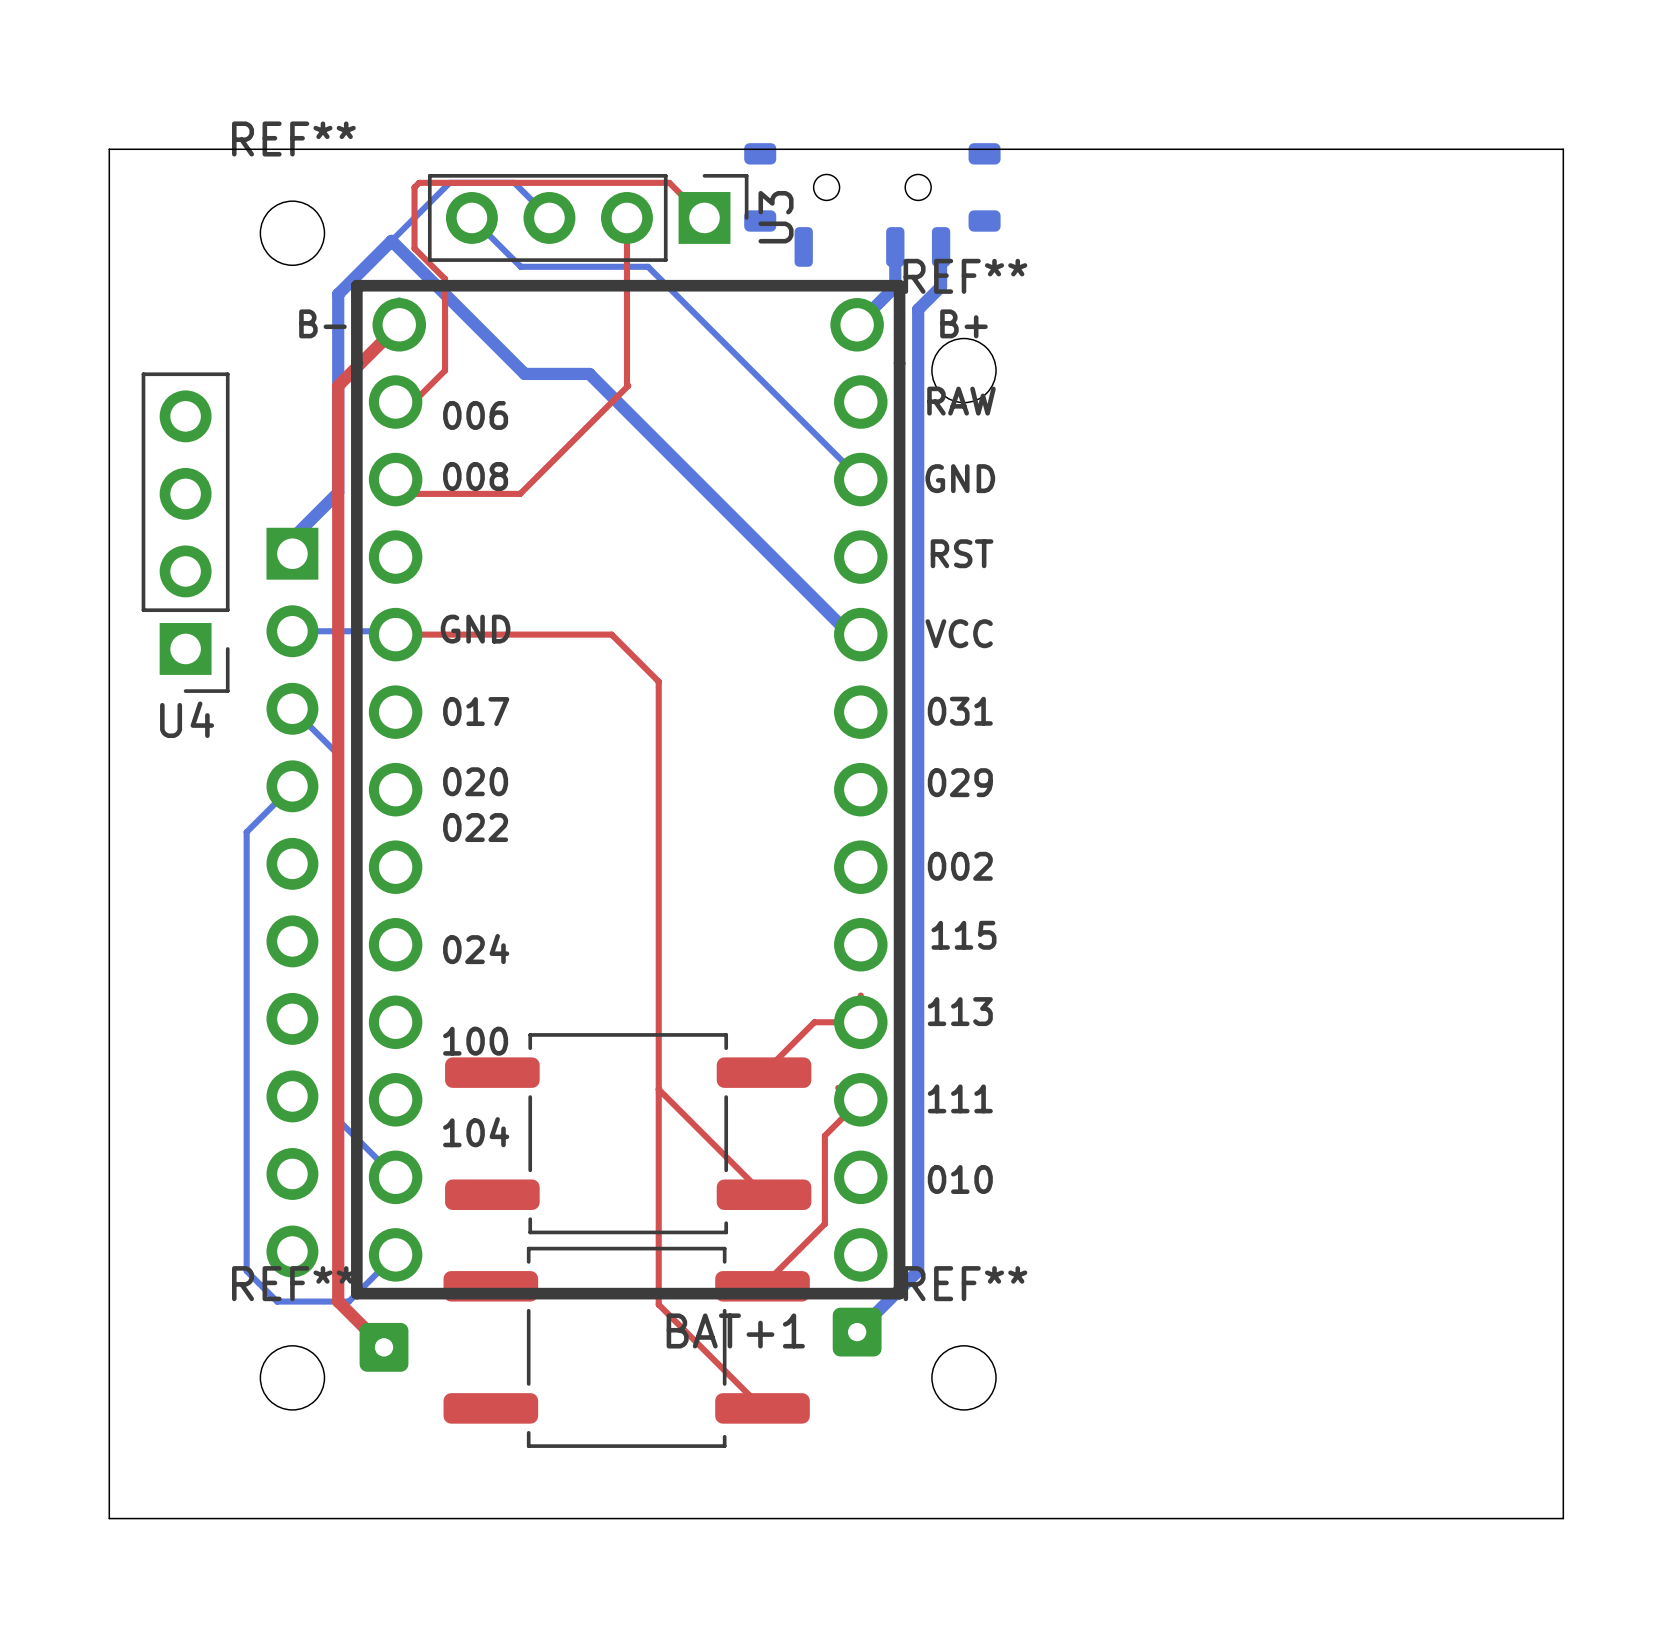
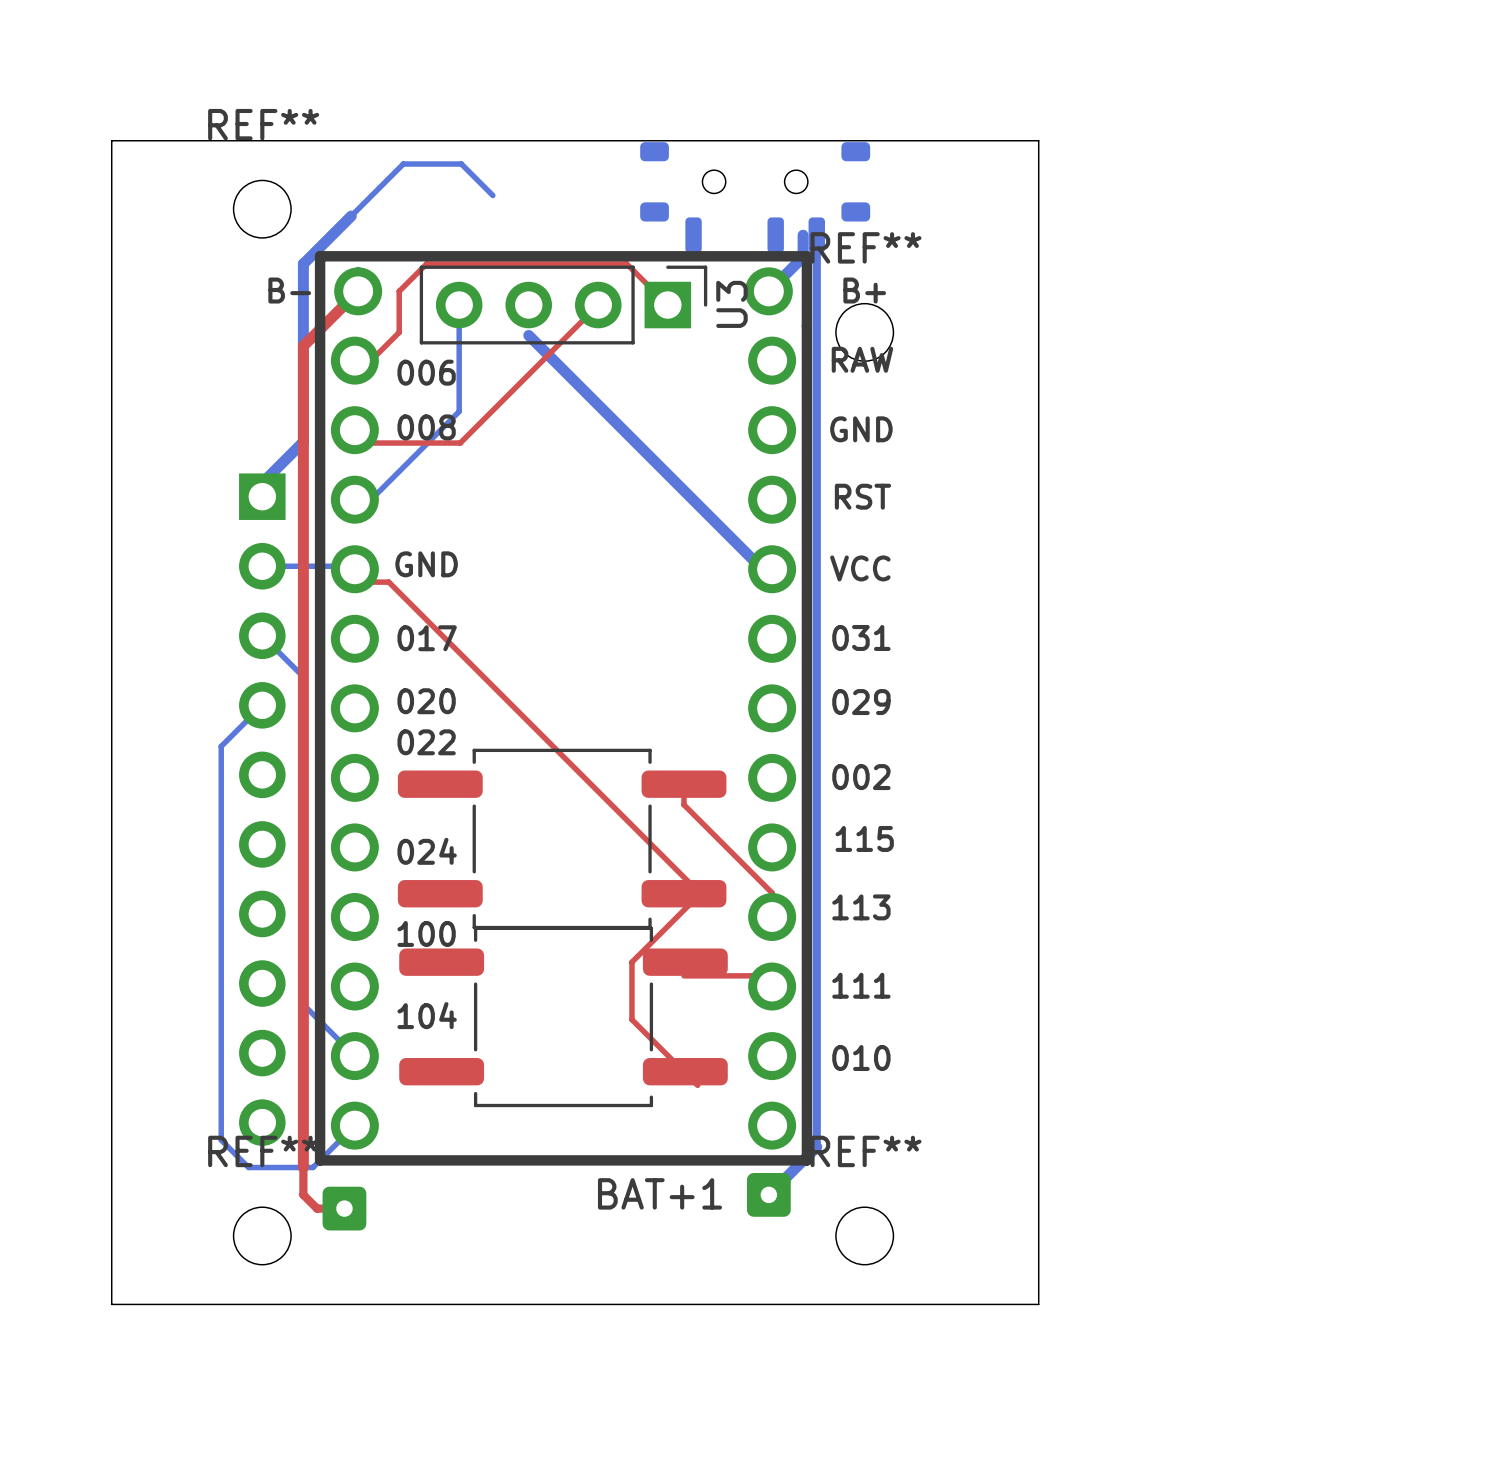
board edge: (109, 149) (1563, 149) (1563, 1518) (109, 1518) (109, 149) -> (111, 140) (111, 1304) (1038, 1304) (1038, 140) (111, 140)
part position: (872, 204) -> (755, 197)
bottom track: (471, 217) (520, 266) (648, 266) (860, 479) -> none
U3 position: (588, 217) -> (563, 305)
top track: (626, 217) (628, 385) (520, 493) (513, 493) -> (598, 305) (460, 443)
top track: (704, 217) (669, 182) (419, 182) (414, 187) (414, 248) (445, 279) (445, 324) -> (667, 305) (626, 263) (426, 263) (399, 291)
bottom track: (391, 240) (524, 373) (589, 373) -> none
bottom track: (941, 262) (941, 286) (918, 309) (918, 1271) (910, 1278) -> (816, 248) (816, 1146)
bottom track: none -> (459, 305) (459, 411) (358, 512)
U4: (185, 532) -> none
top track: (395, 634) (611, 634) (658, 681) (658, 1304) (762, 1408) -> none
top track: none -> (358, 582) (388, 582) (700, 893) (631, 962) (631, 1019) (697, 1085)
top track: none -> (683, 784) (683, 804) (772, 892)
top track: (860, 1022) (814, 1022) (764, 1072) -> none
top track: none -> (683, 975) (761, 975)
top track: (658, 1089) (764, 1194) -> none
top track: (860, 1099) (824, 1135) (824, 1223) (762, 1286) -> none
top track: (338, 1301) (384, 1347) -> (303, 1167) (303, 1194) (317, 1208) (344, 1208)
part position: (626, 1347) -> (562, 838)

